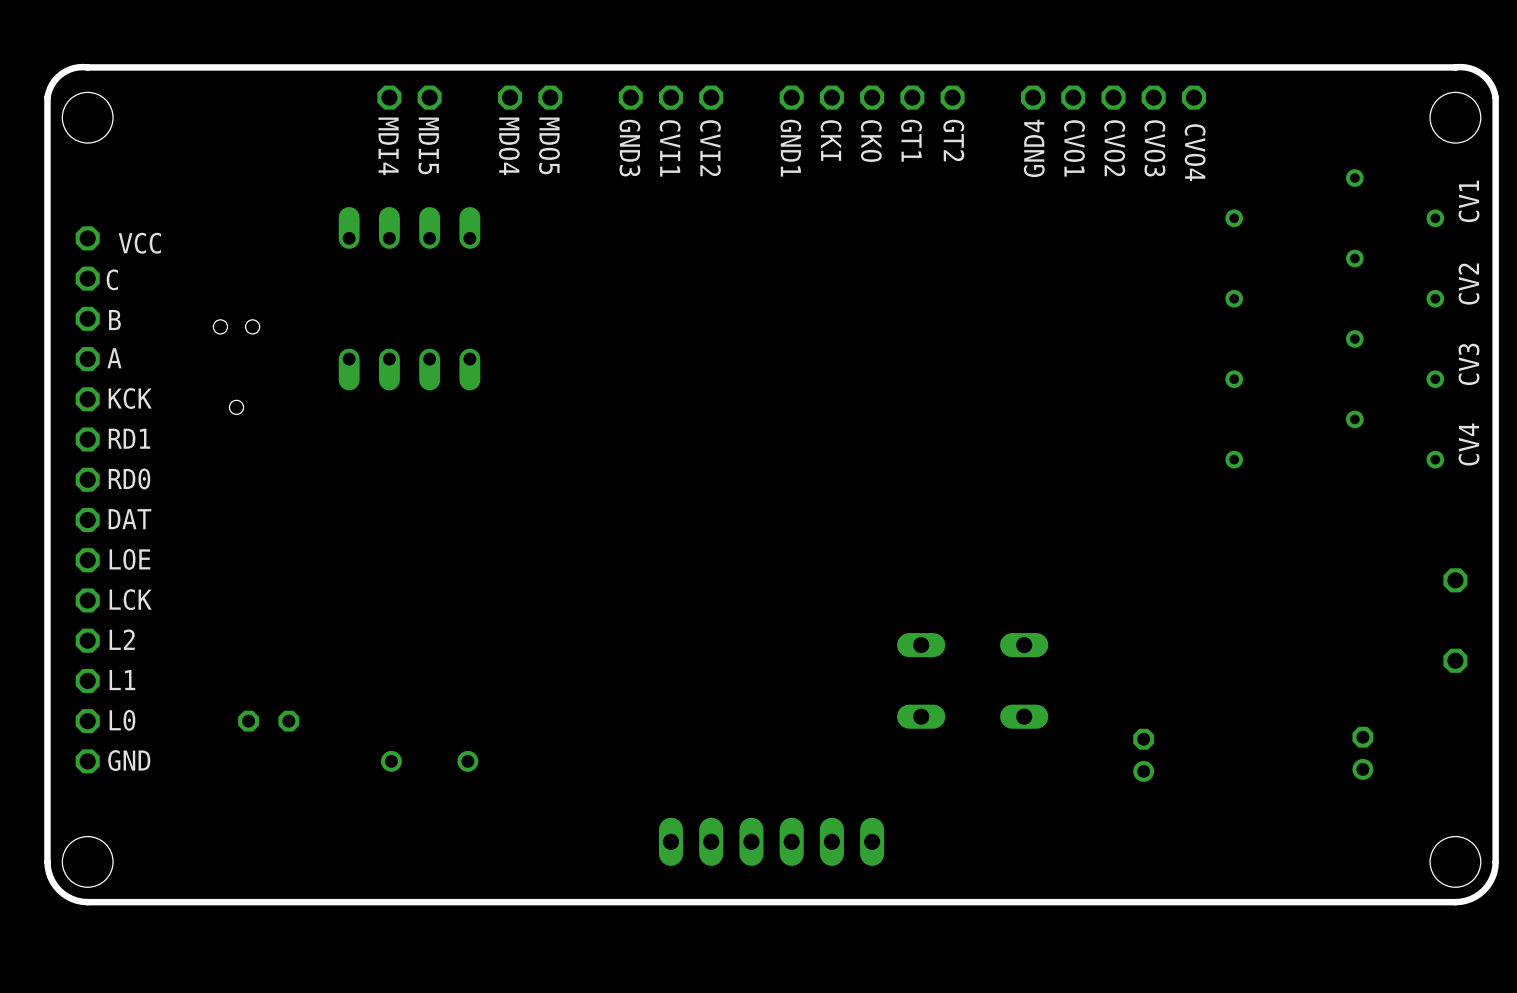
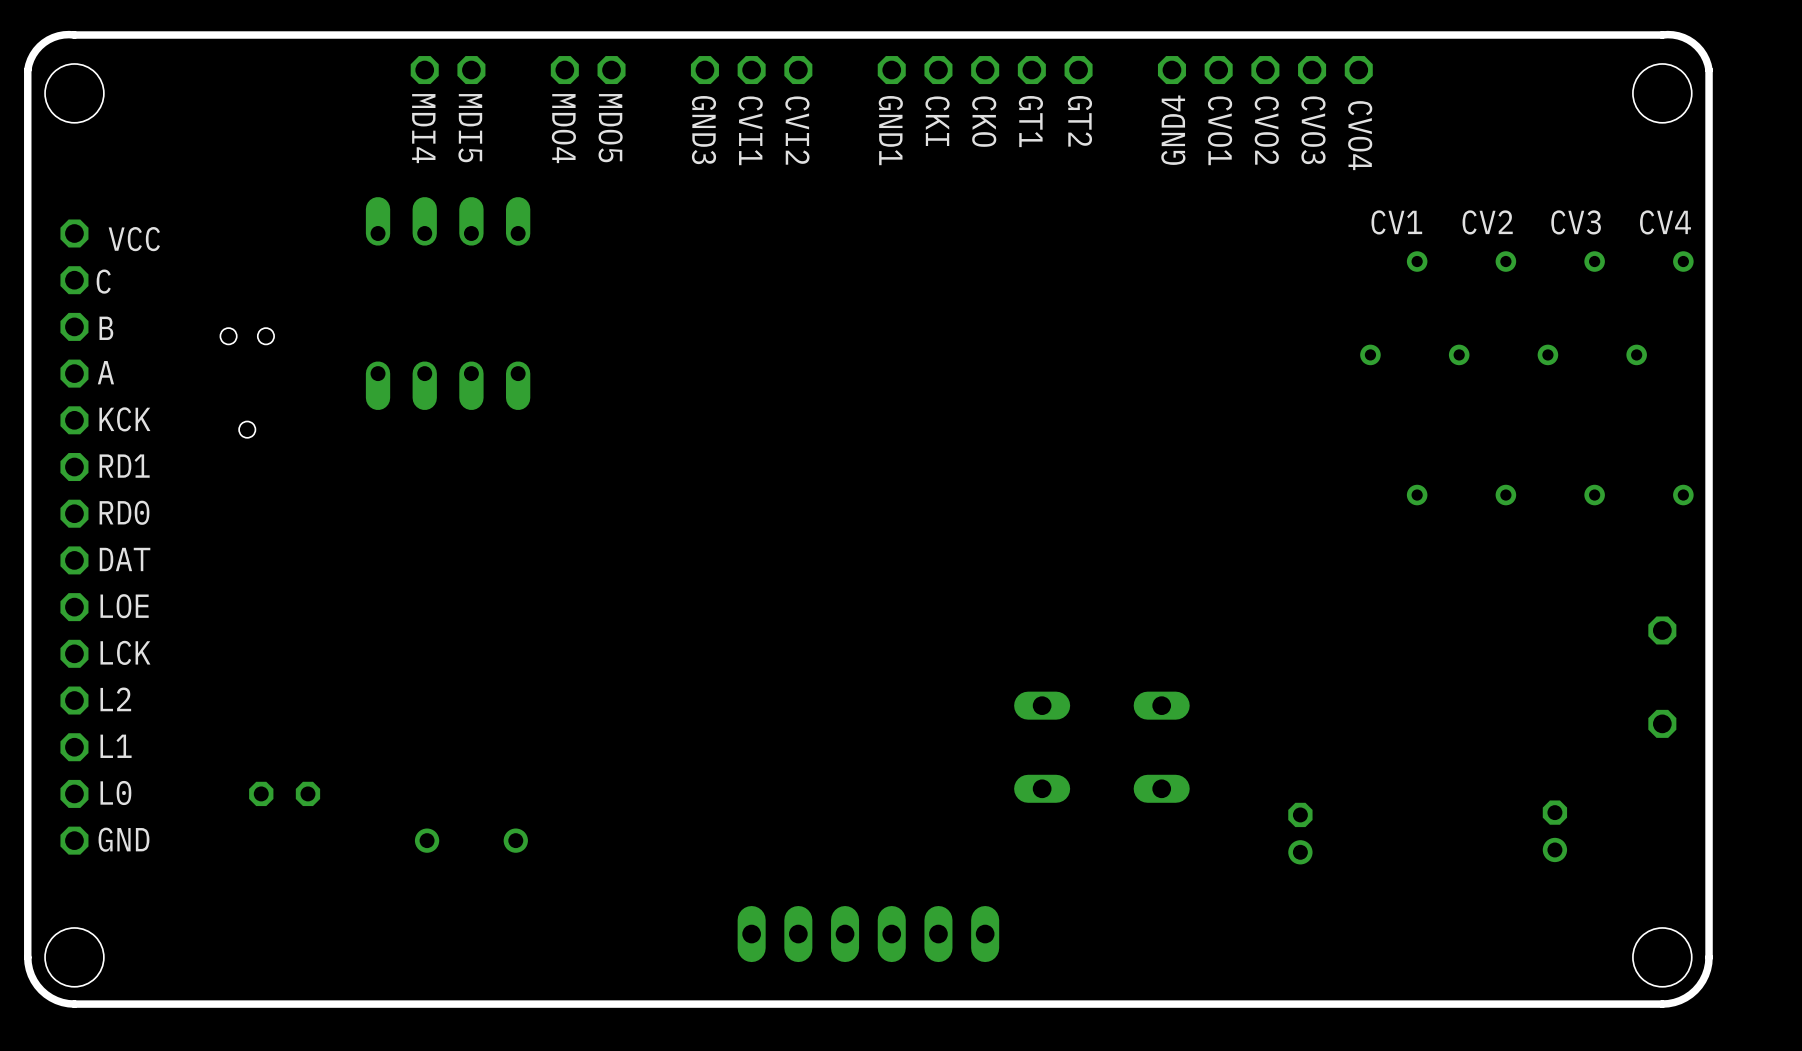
CV1 rotation: 0° (1334, 198) -> 90° counterclockwise (1393, 378)
CV1 position: (1334, 198) -> (1393, 378)
CV2 rotation: 0° (1334, 278) -> 90° counterclockwise (1482, 378)
CV3 rotation: 0° (1334, 359) -> 90° counterclockwise (1571, 378)
CV4 rotation: 0° (1334, 439) -> 90° counterclockwise (1660, 378)
CV4 position: (1334, 439) -> (1660, 378)

